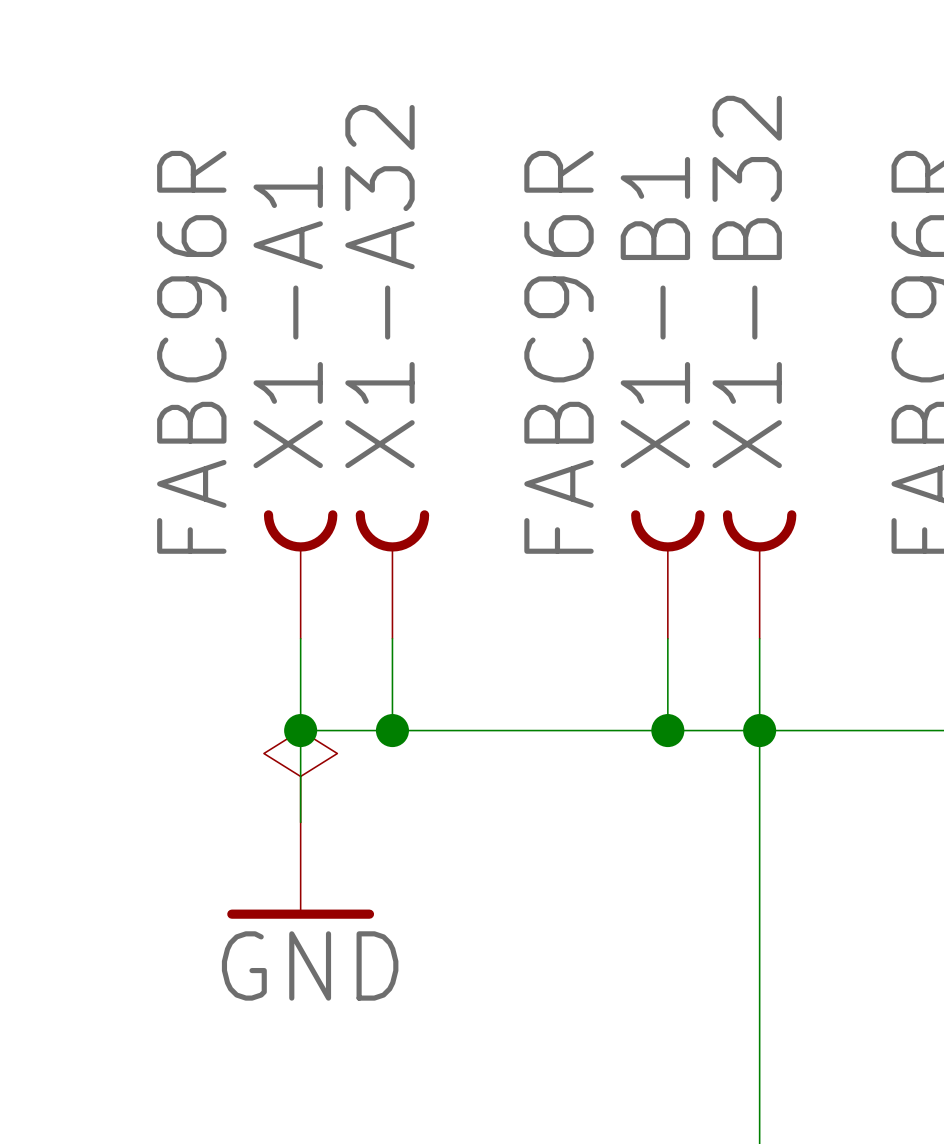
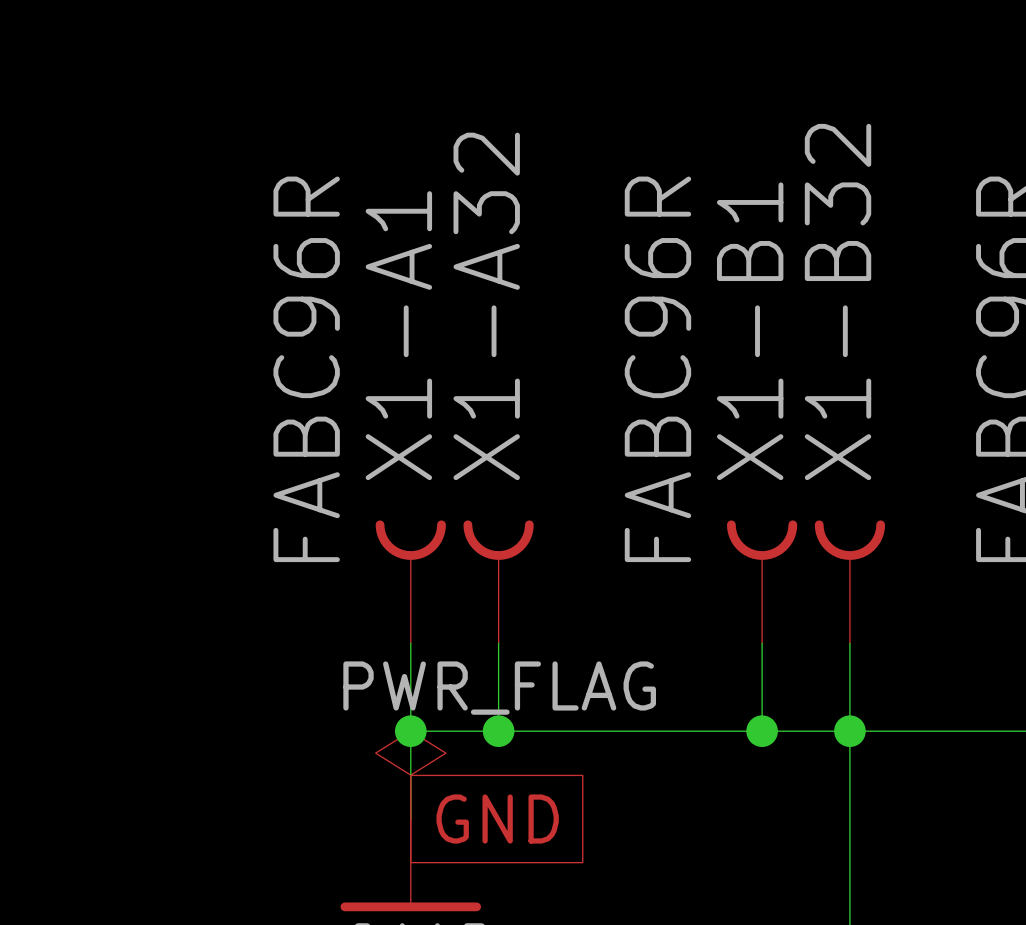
power symbol text: none -> PWR_FLAG (499, 688)
global label: none -> GND (497, 819)

